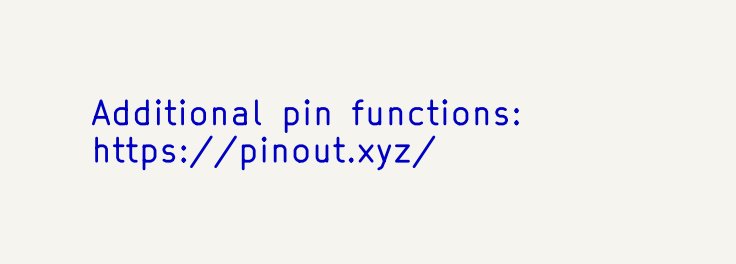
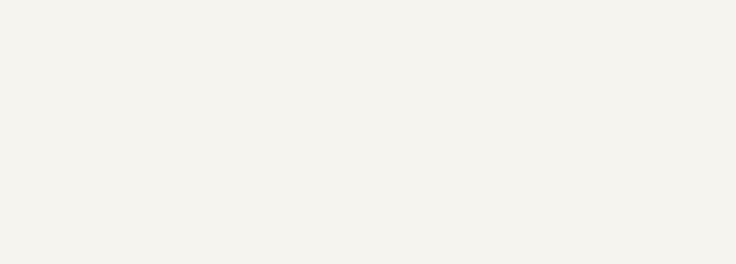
text: Additional pin functions: (305, 116) -> none
text: https://pinout.xyz/ (265, 152) -> none

